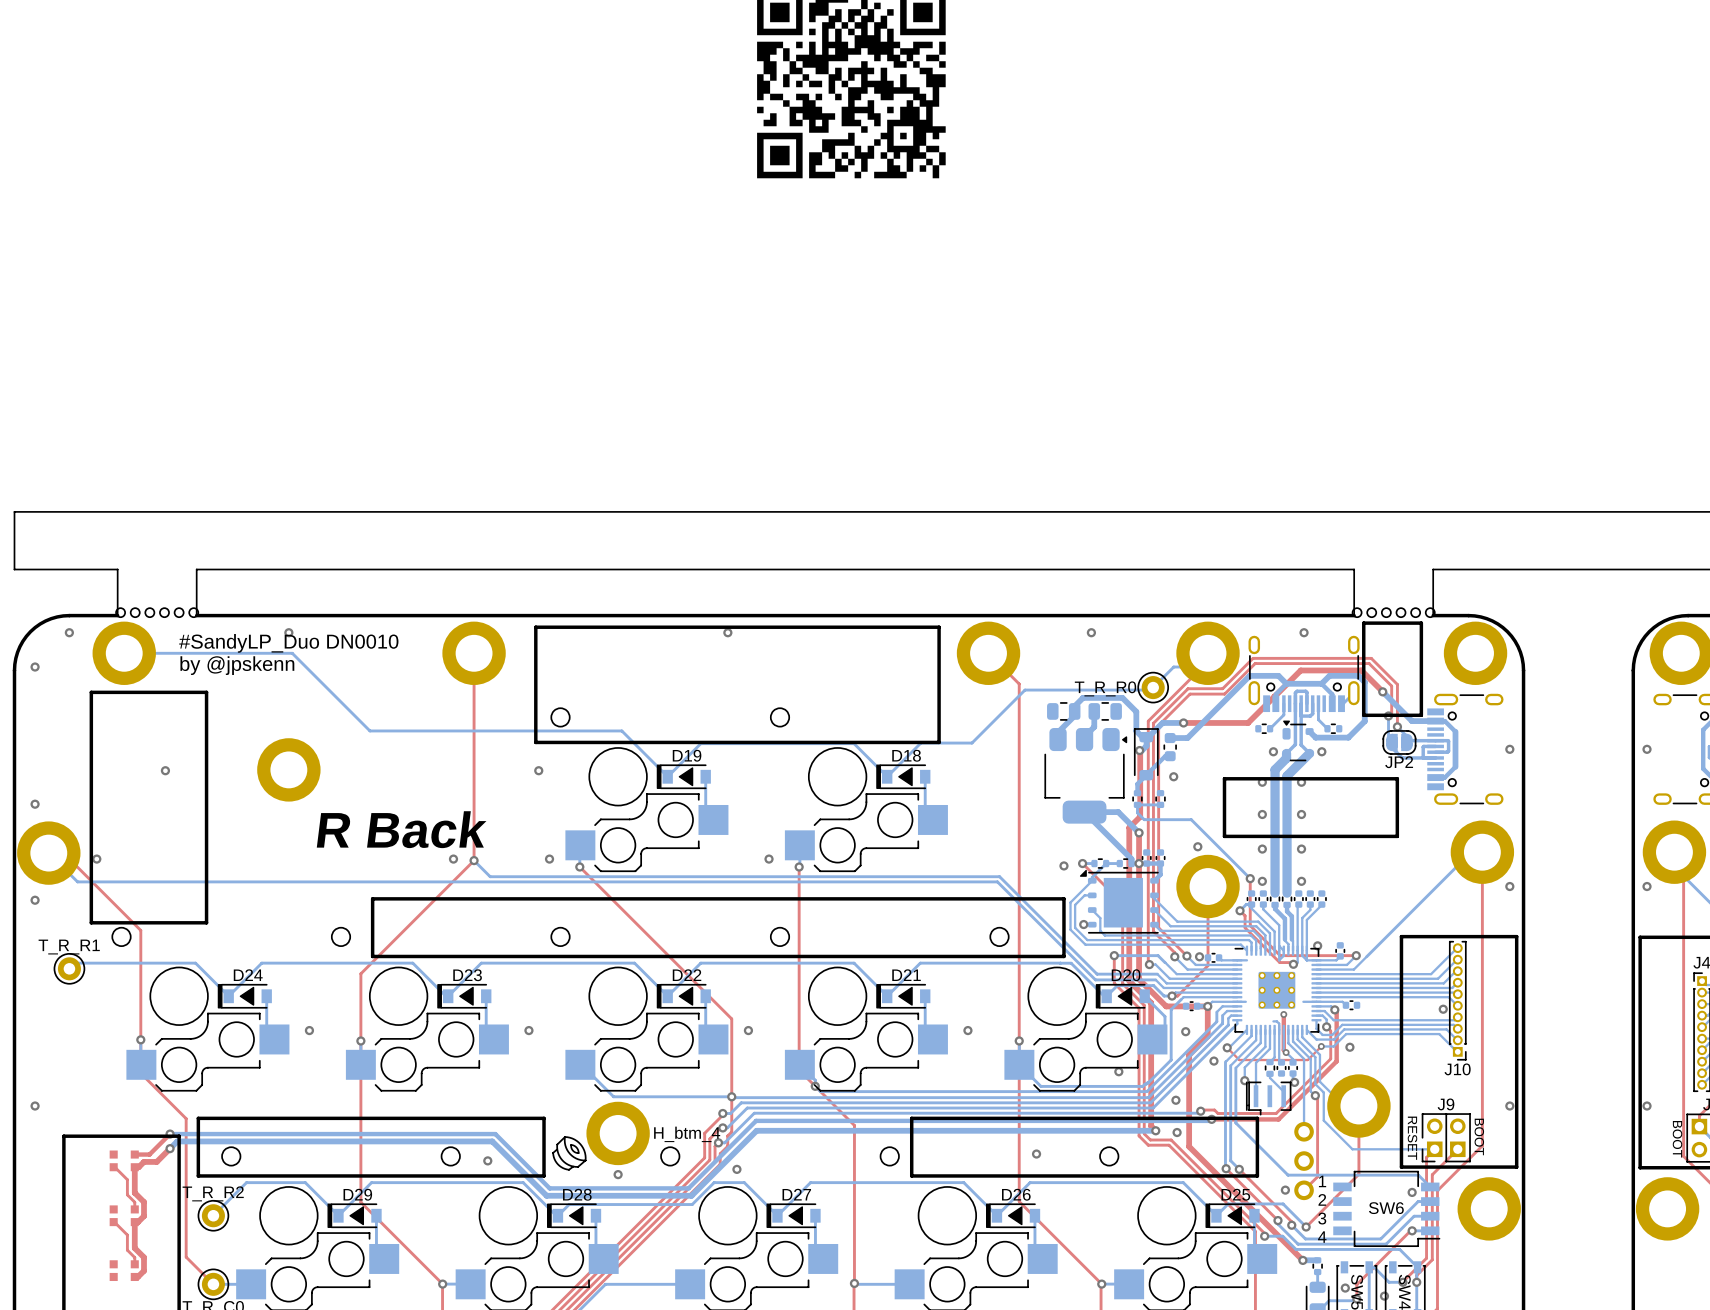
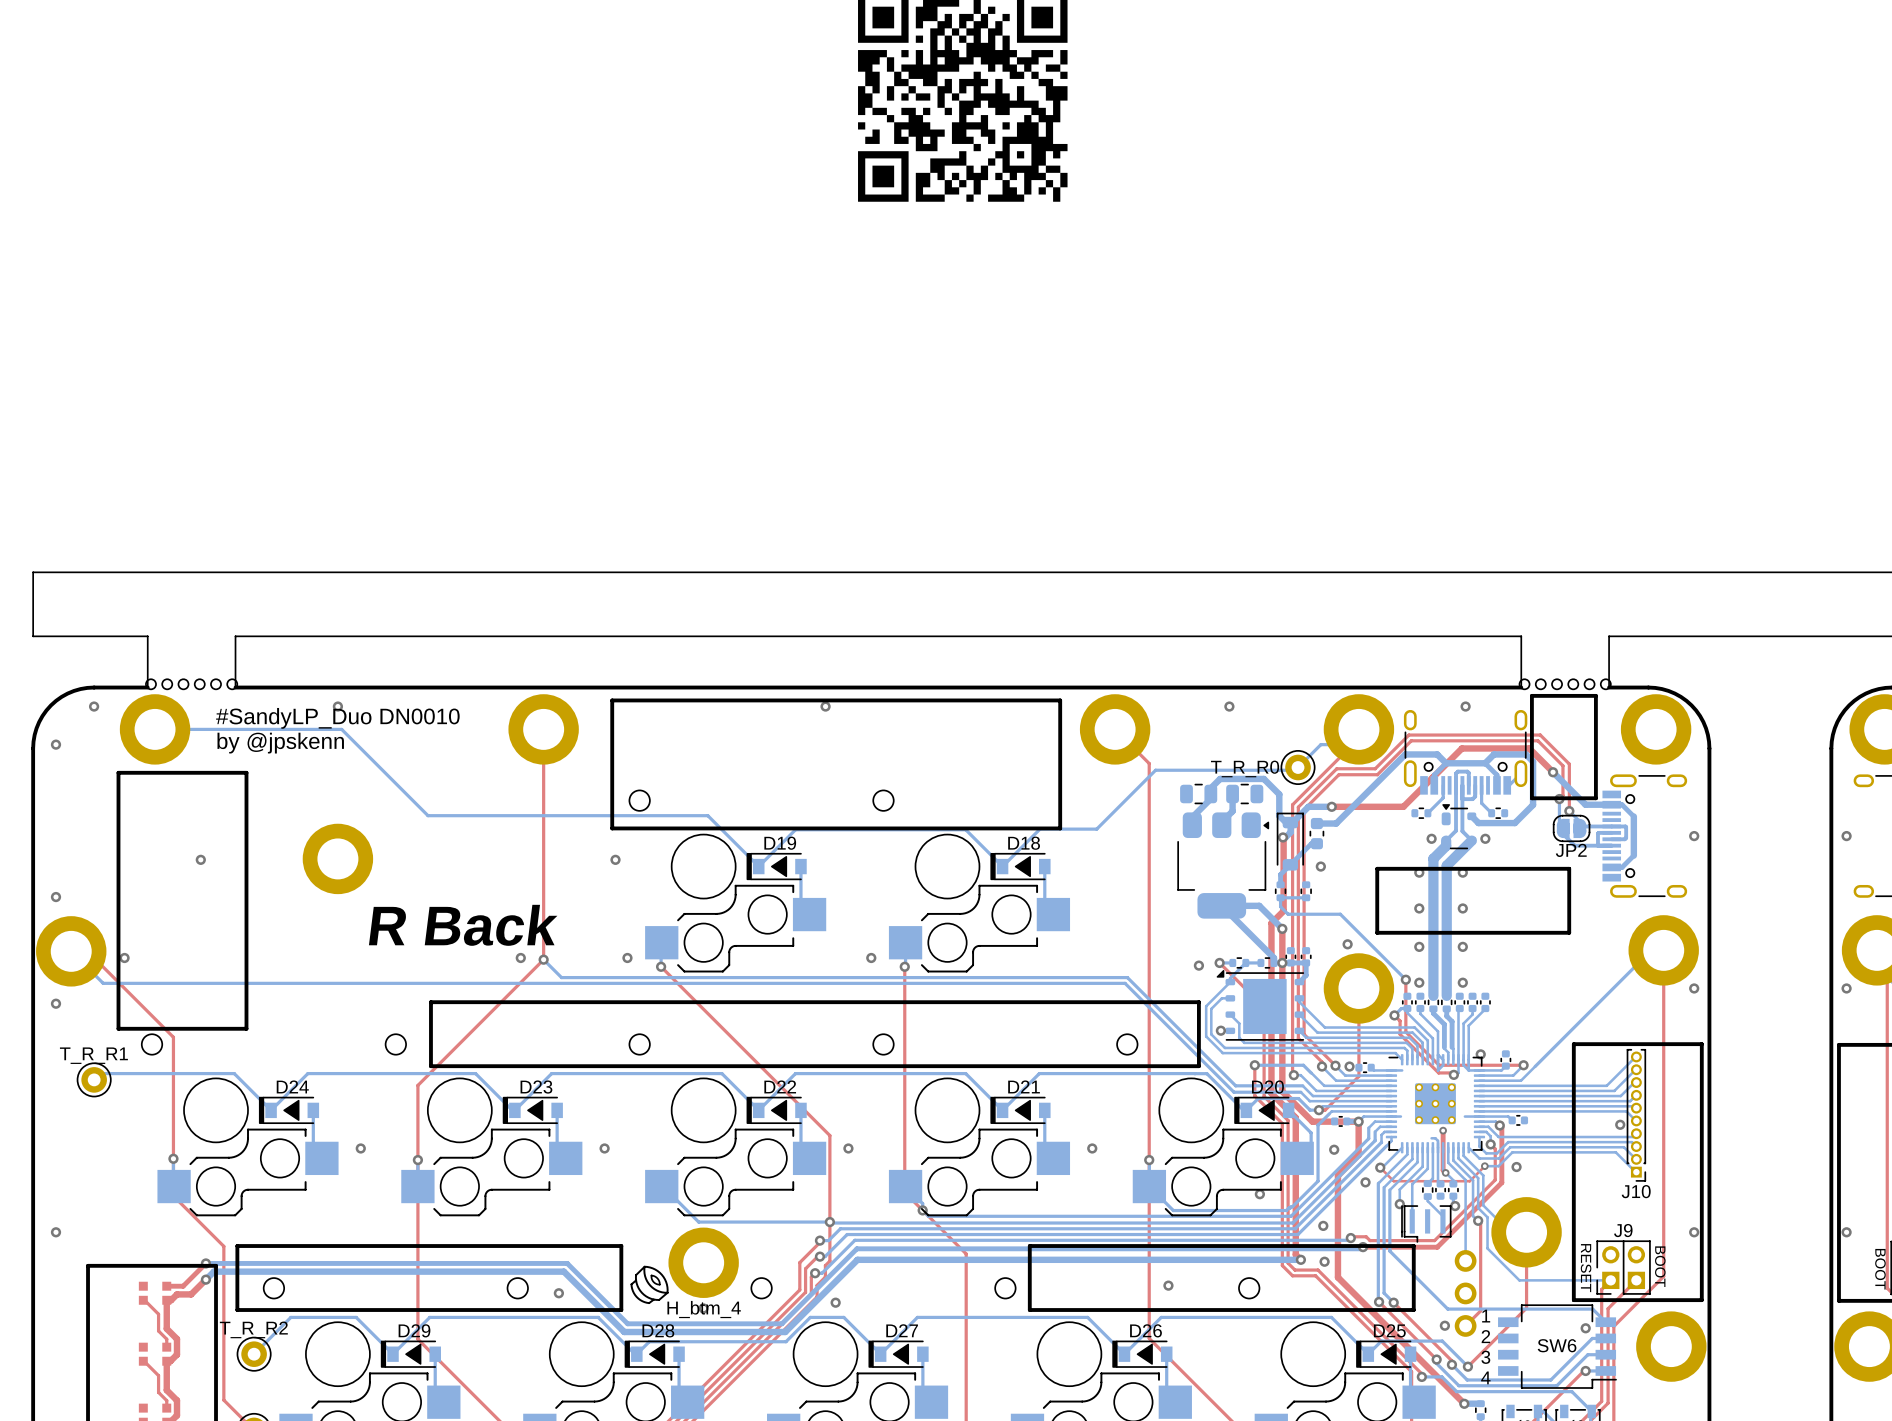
H_btm_4 name position: H_btm_4 (687, 1134) -> H_btm_4 (704, 1309)

